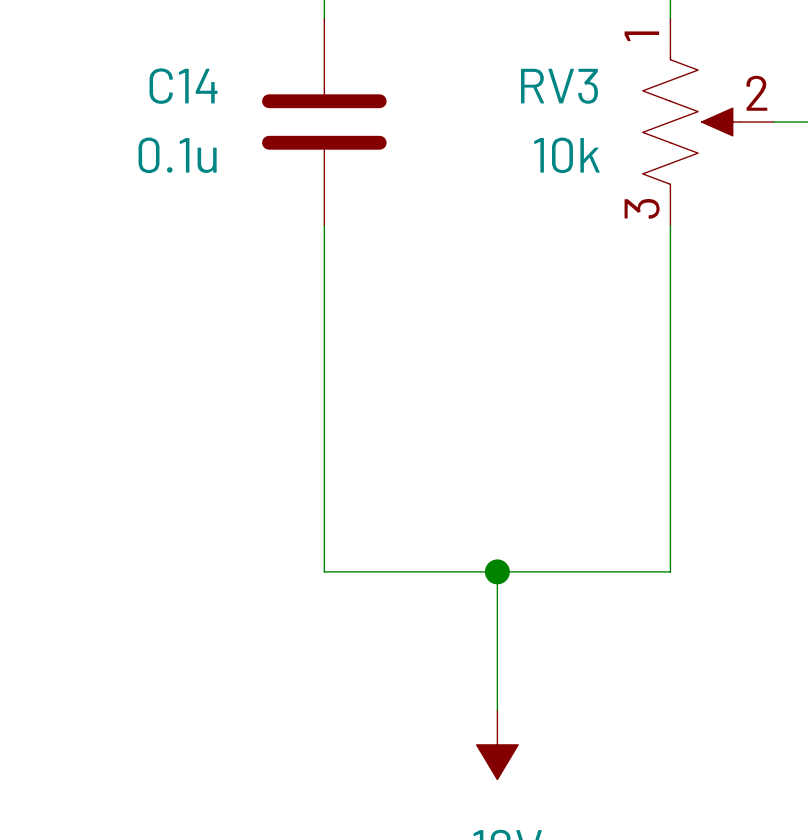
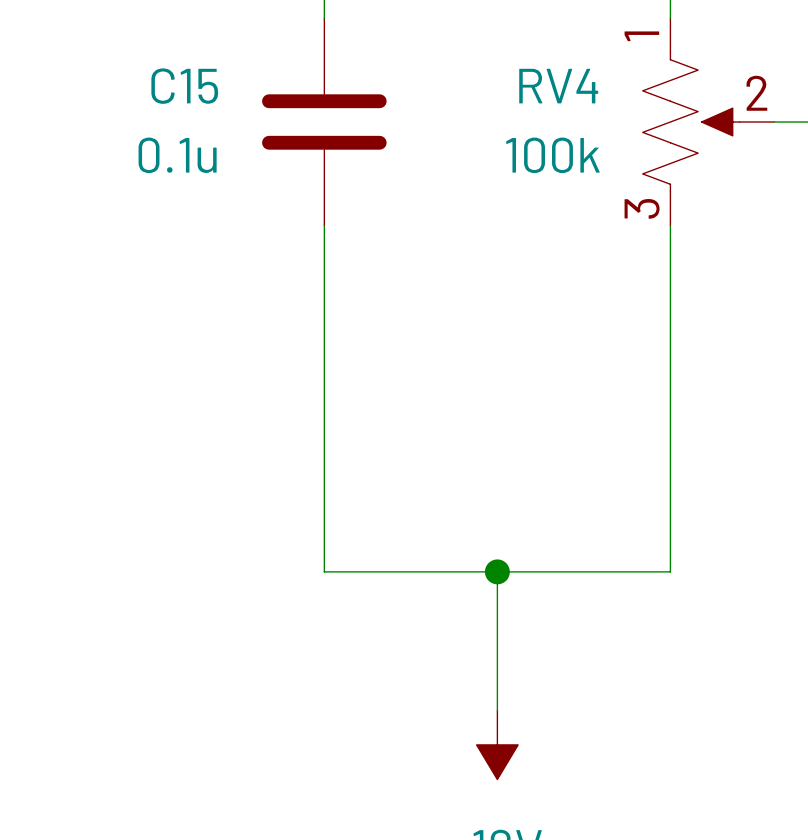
C14 name: C14 (183, 86) -> C15 (184, 86)
RV3 name: RV3 (559, 86) -> RV4 (558, 86)
RV3 value: 10k (566, 155) -> 100k (552, 155)

